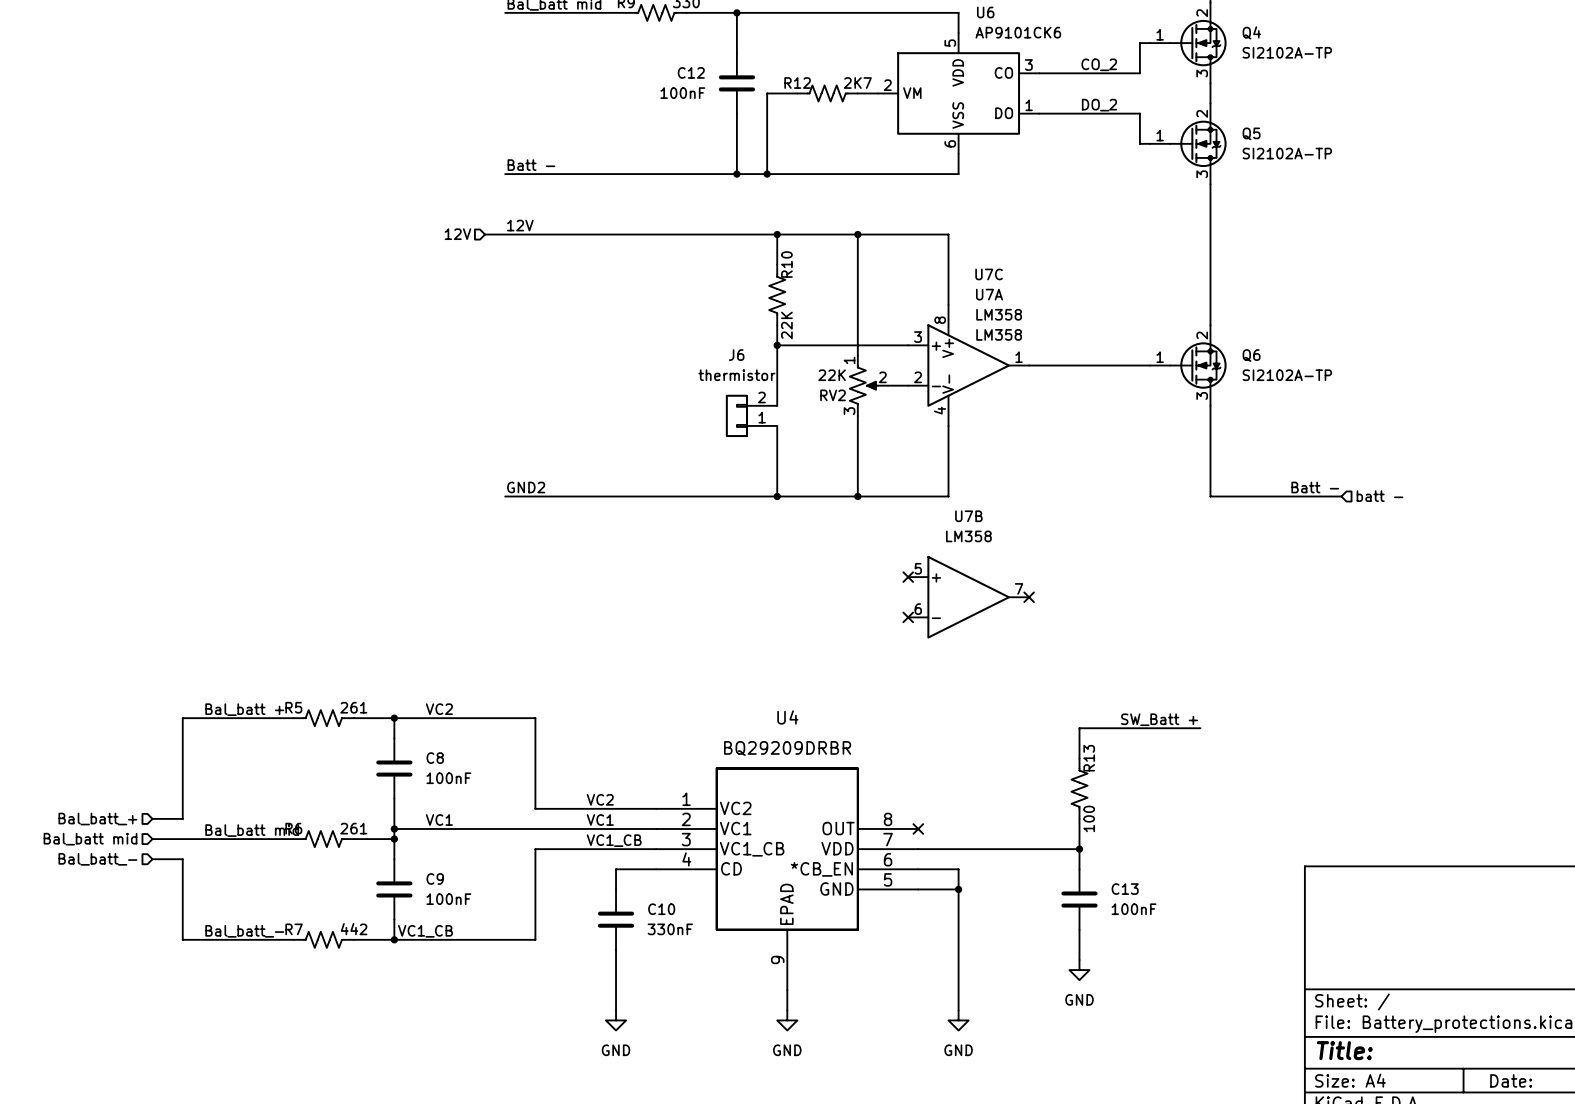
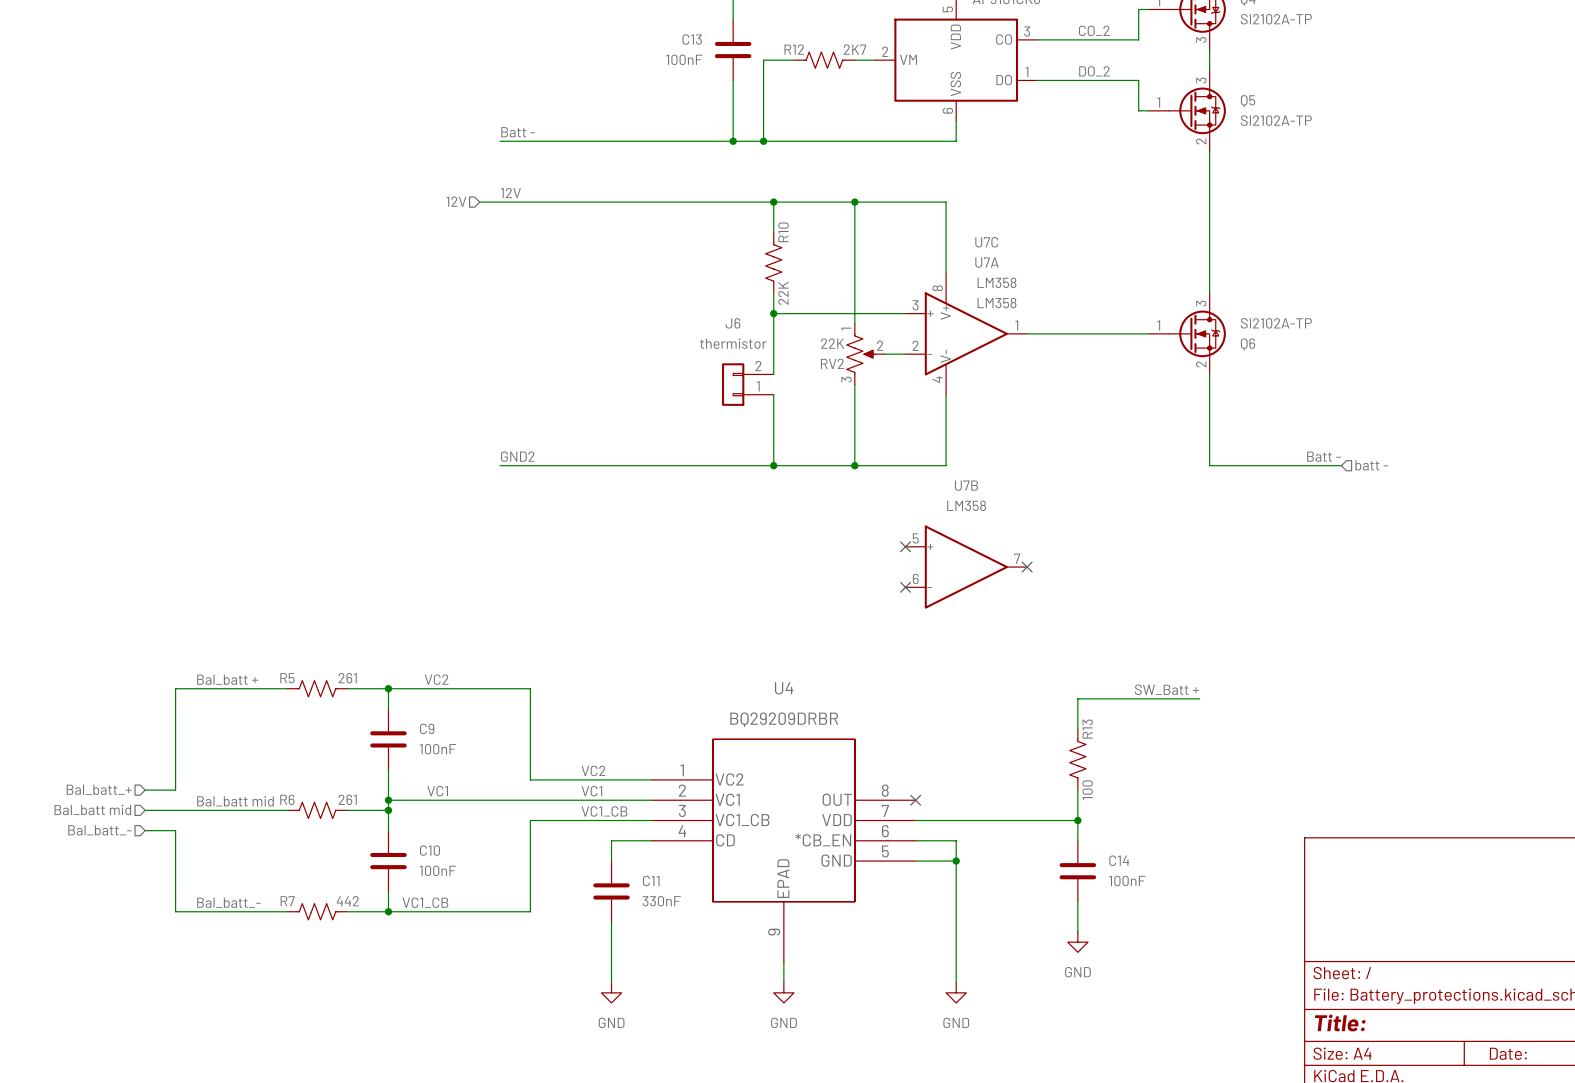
C12 name: C12 (691, 72) -> C13 (692, 39)
Q5 flip: as is (1198, 143) -> up-down (1197, 110)
Q6 flip: as is (1198, 365) -> up-down (1197, 333)
C8 name: C8 (435, 758) -> C9 (427, 728)
C9 name: C9 (435, 878) -> C10 (429, 850)
C13 name: C13 (1125, 889) -> C14 (1119, 860)
C10 name: C10 (661, 909) -> C11 (651, 880)

